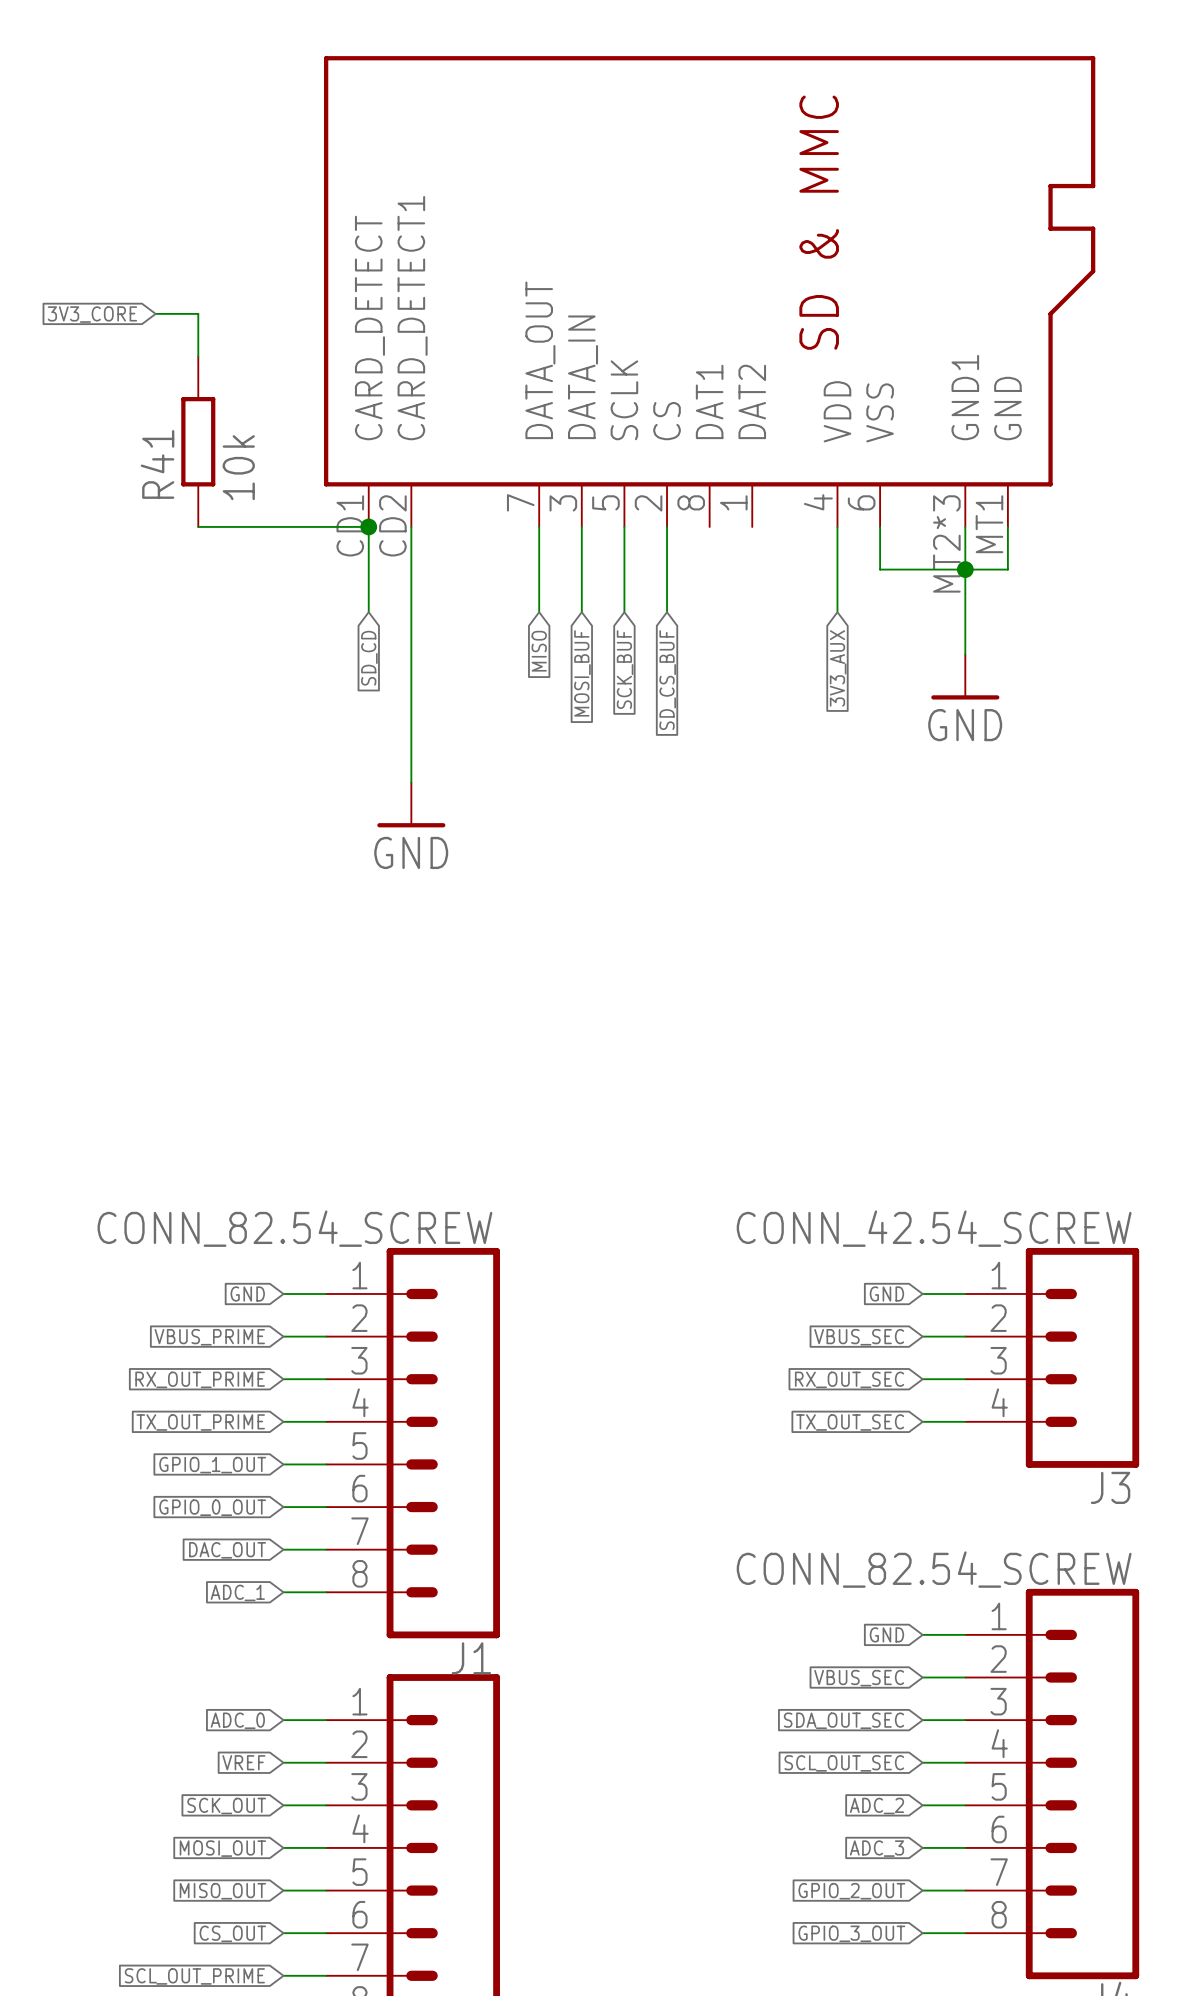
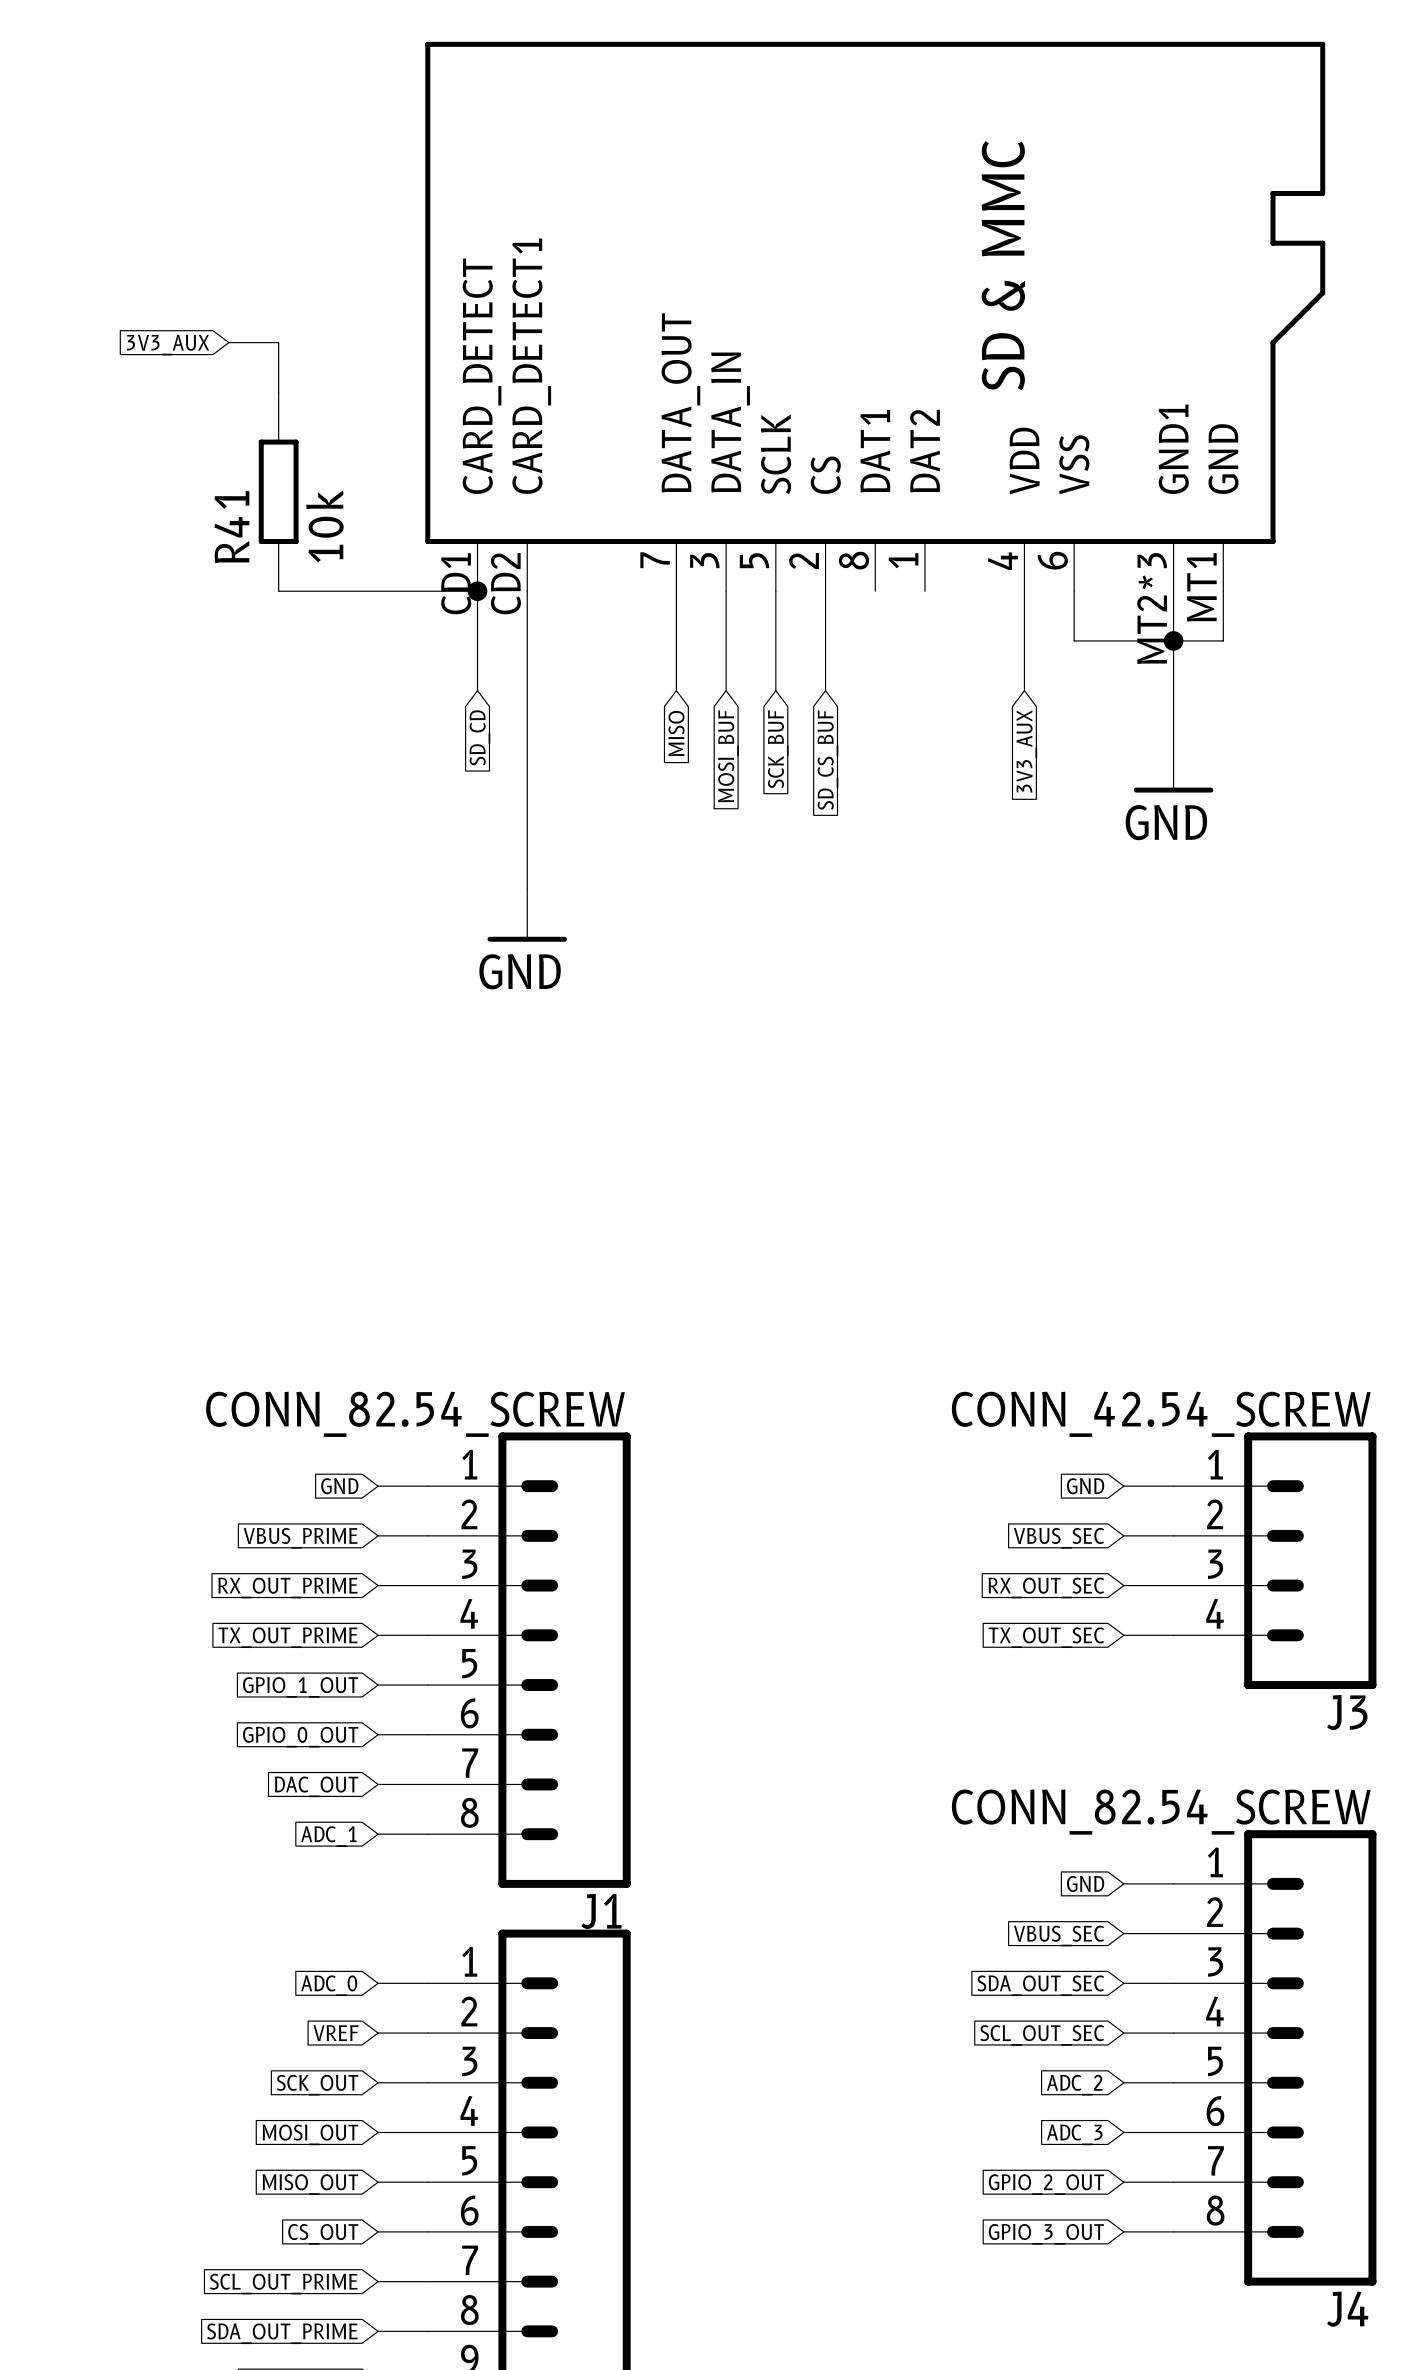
global label: 3V3_CORE (92, 314) -> 3V3_AUX (168, 345)

